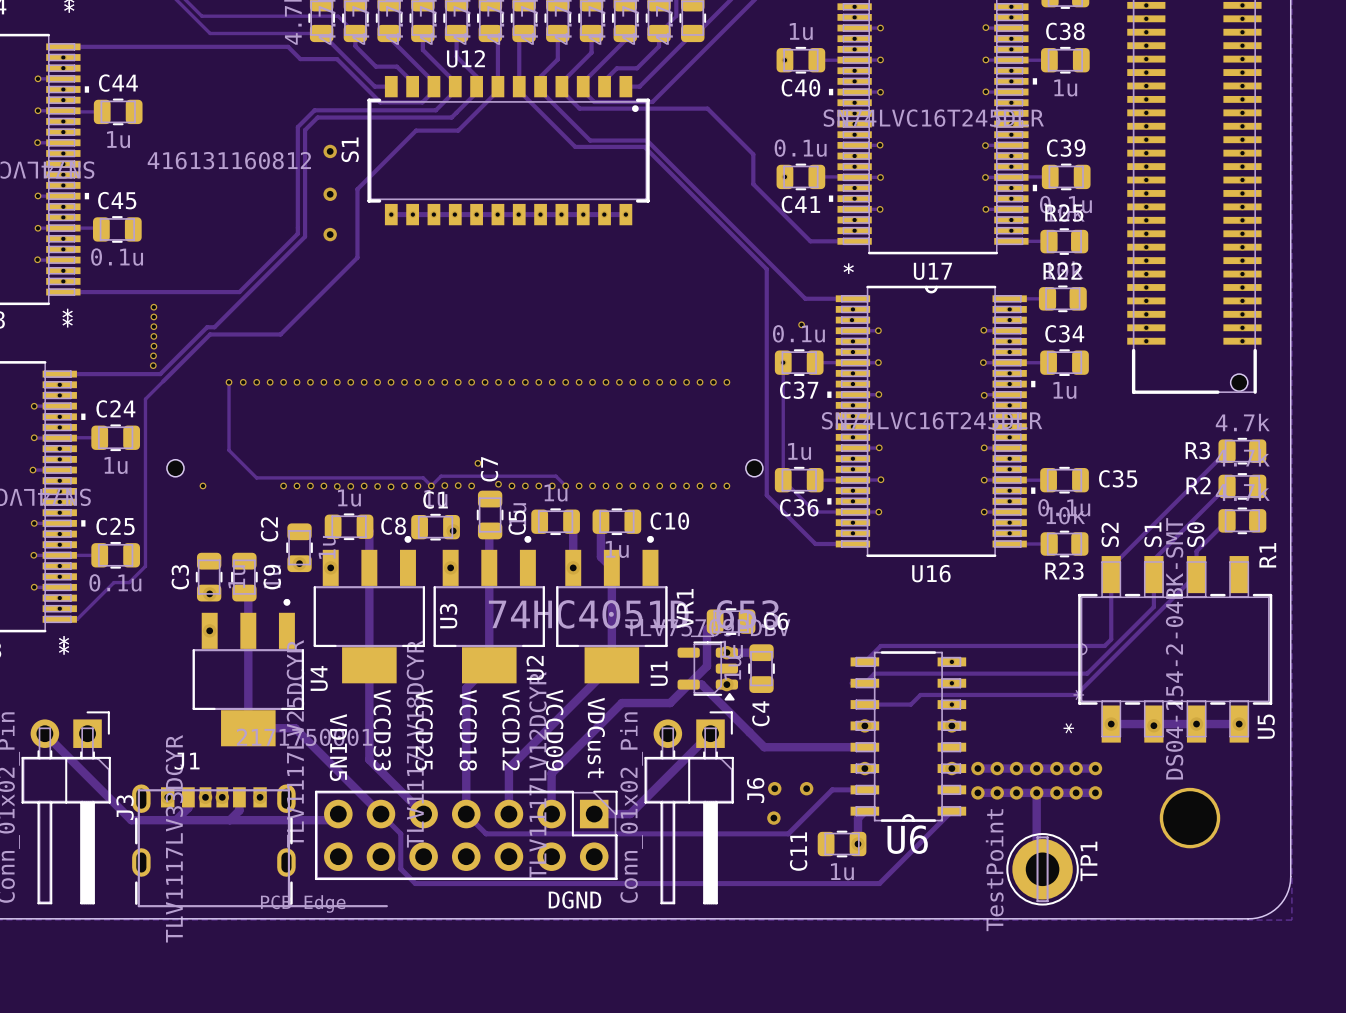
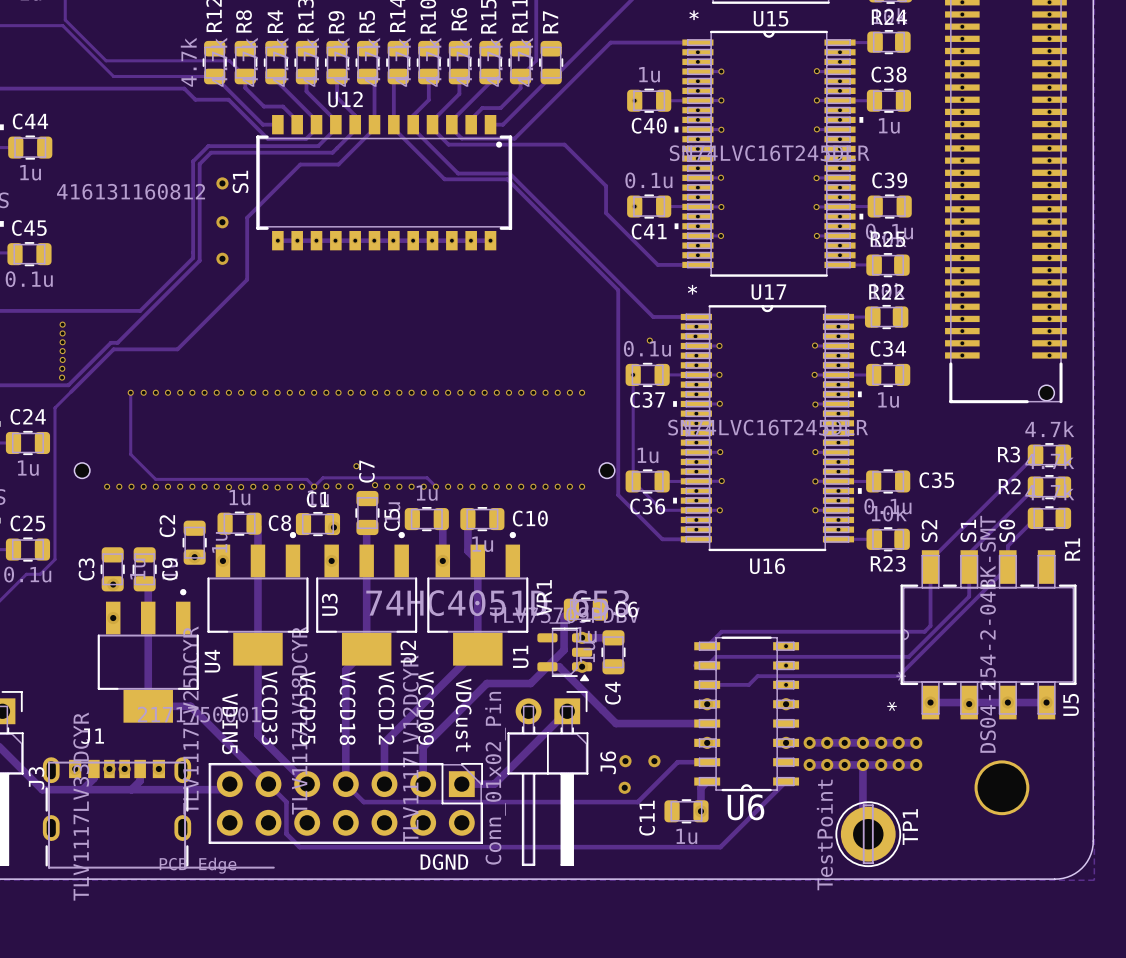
via: none -> (119, 486)
via: none -> (131, 486)
via: none -> (143, 486)
via: none -> (155, 486)
via: none -> (168, 486)

